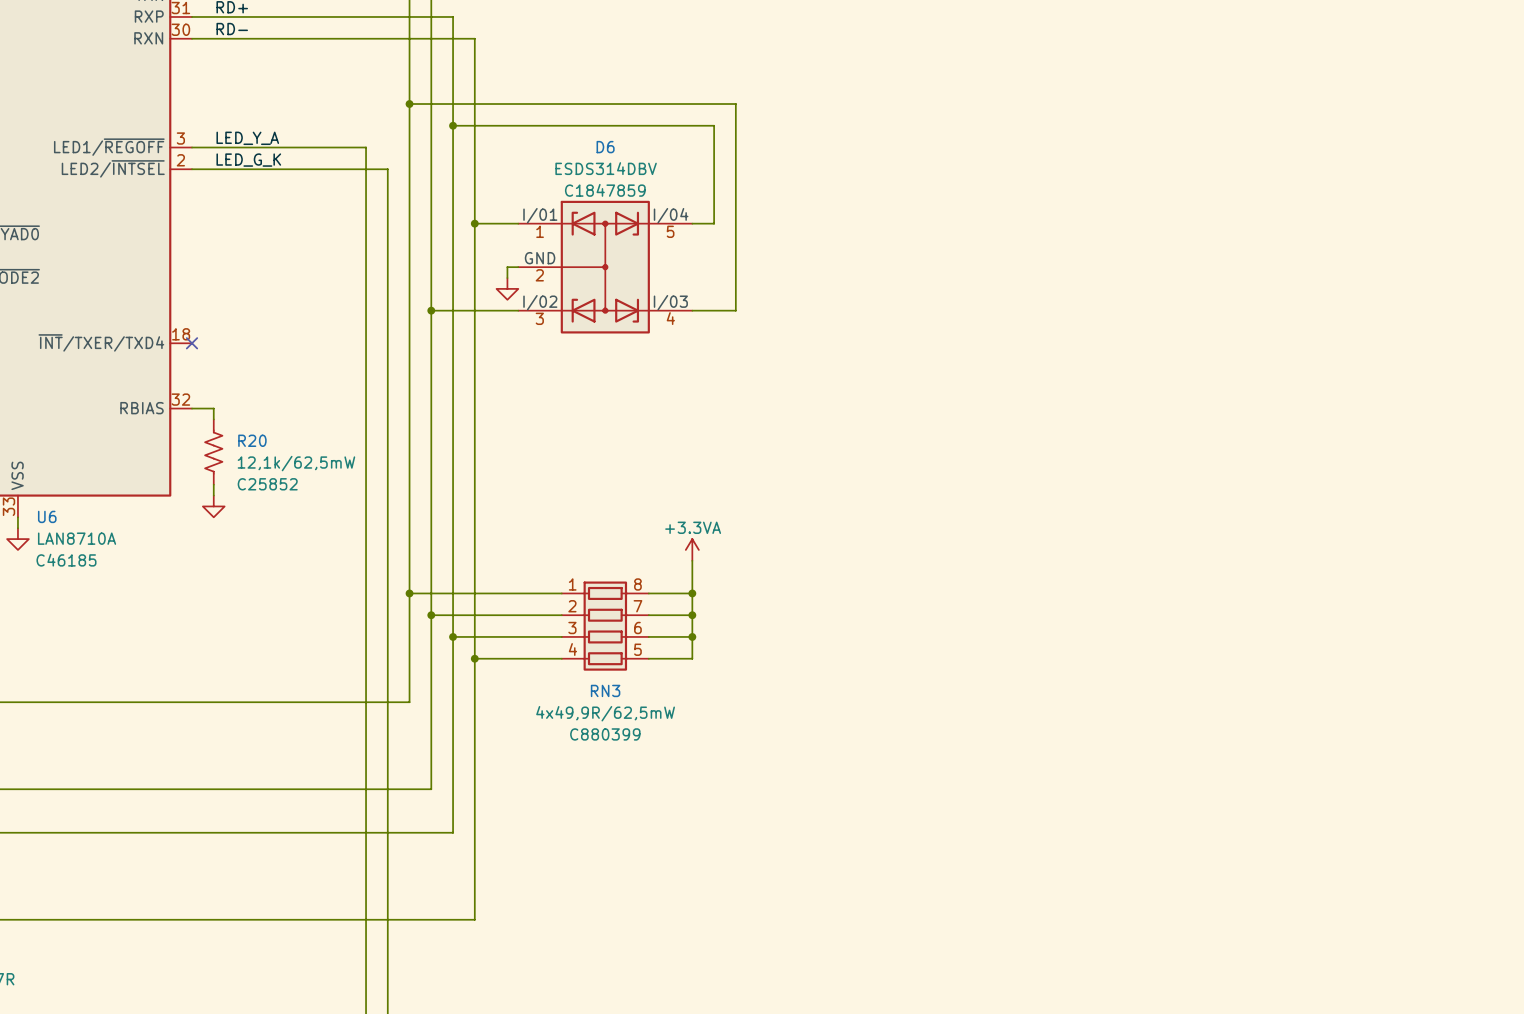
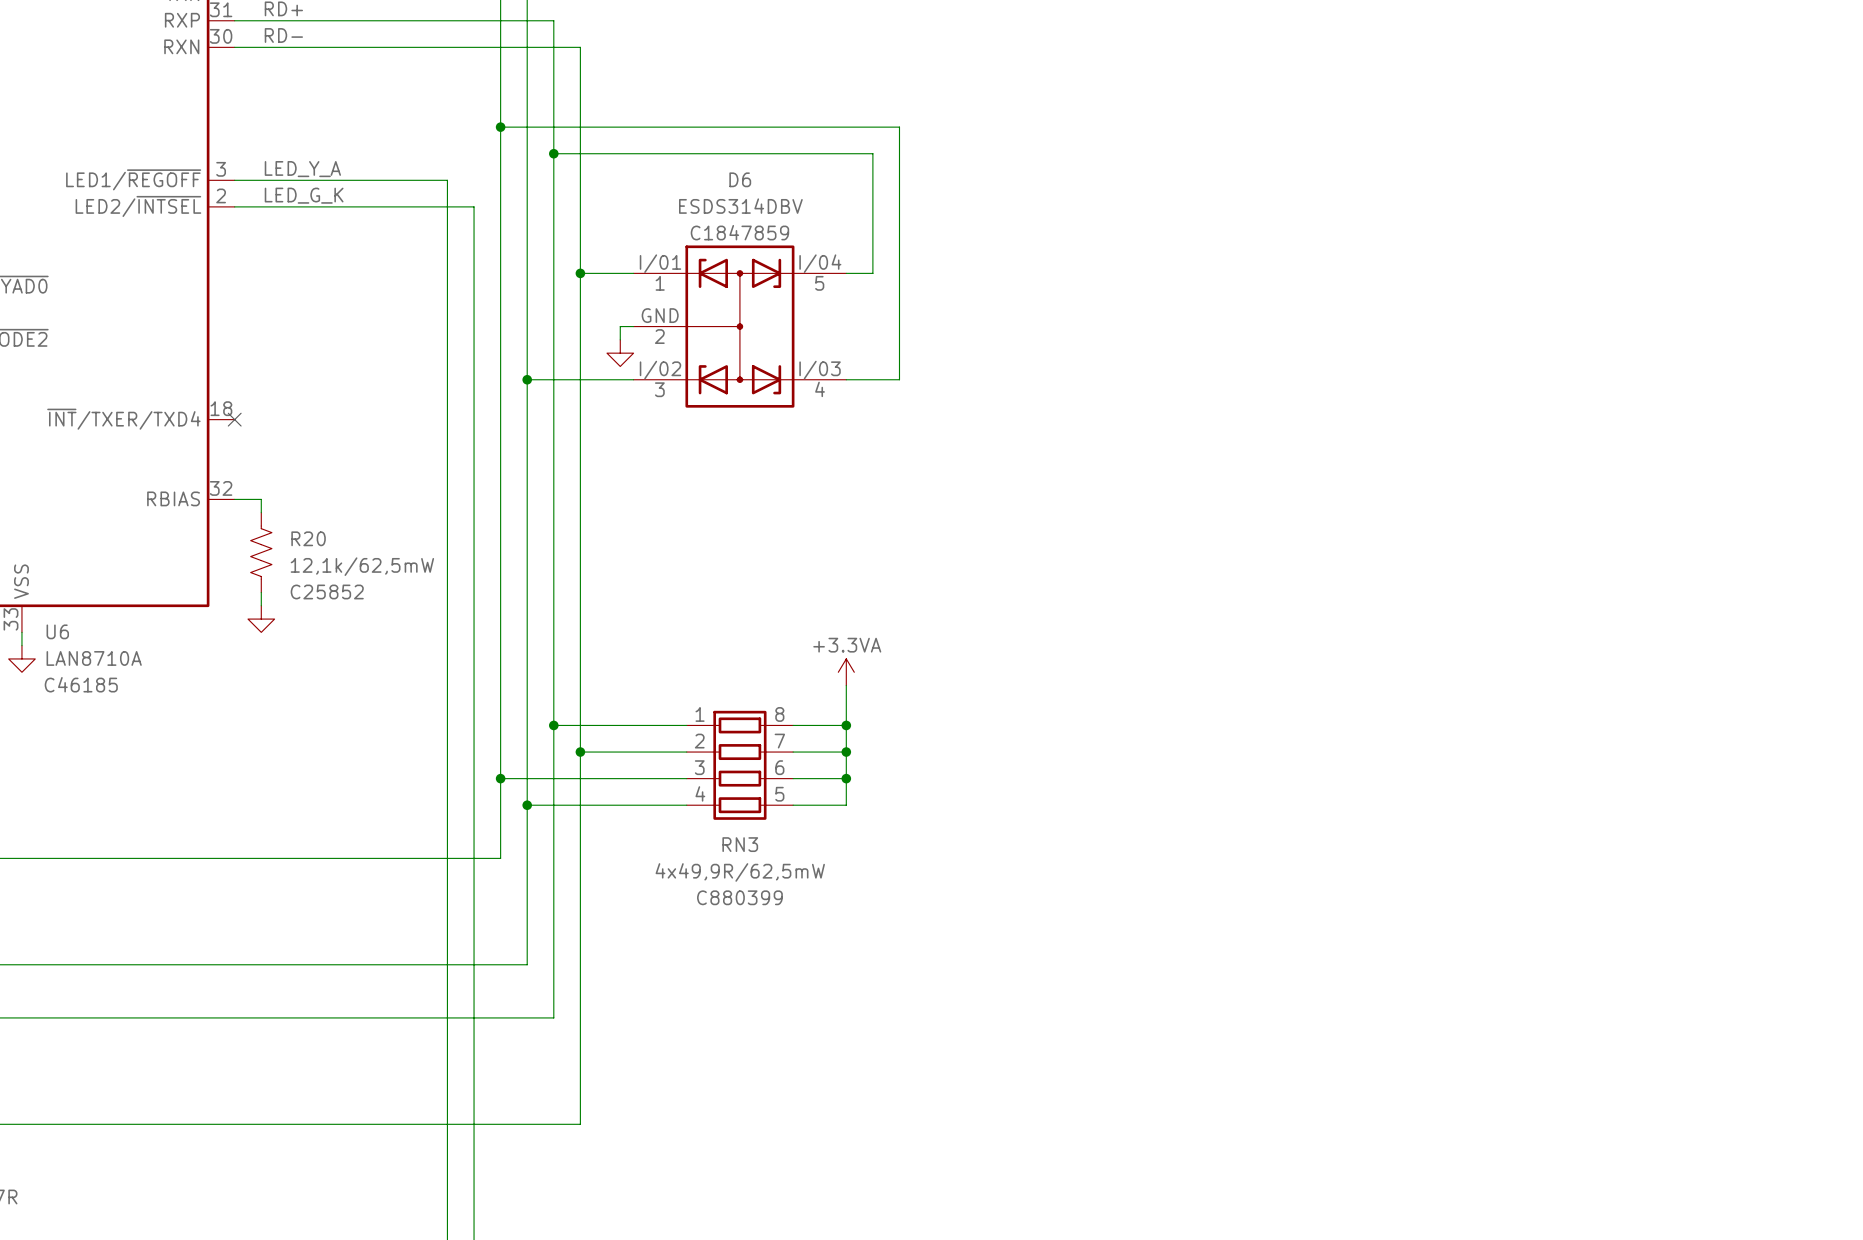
wire: (409, 593) (453, 593) -> (527, 805) (580, 805)
junction: (409, 593) -> none
junction: none -> (553, 725)
wire: (431, 615) (474, 615) -> (500, 778) (553, 778)
junction: (431, 615) -> none
junction: none -> (580, 752)
junction: none -> (500, 778)
junction: (453, 636) -> none
junction: none -> (527, 805)
junction: (474, 658) -> none

